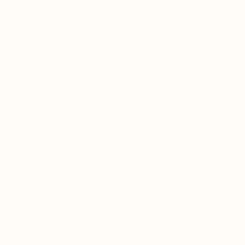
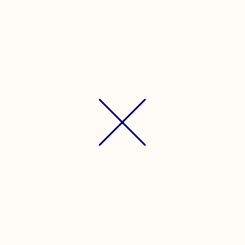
no-connect mark: none -> (122, 122)

